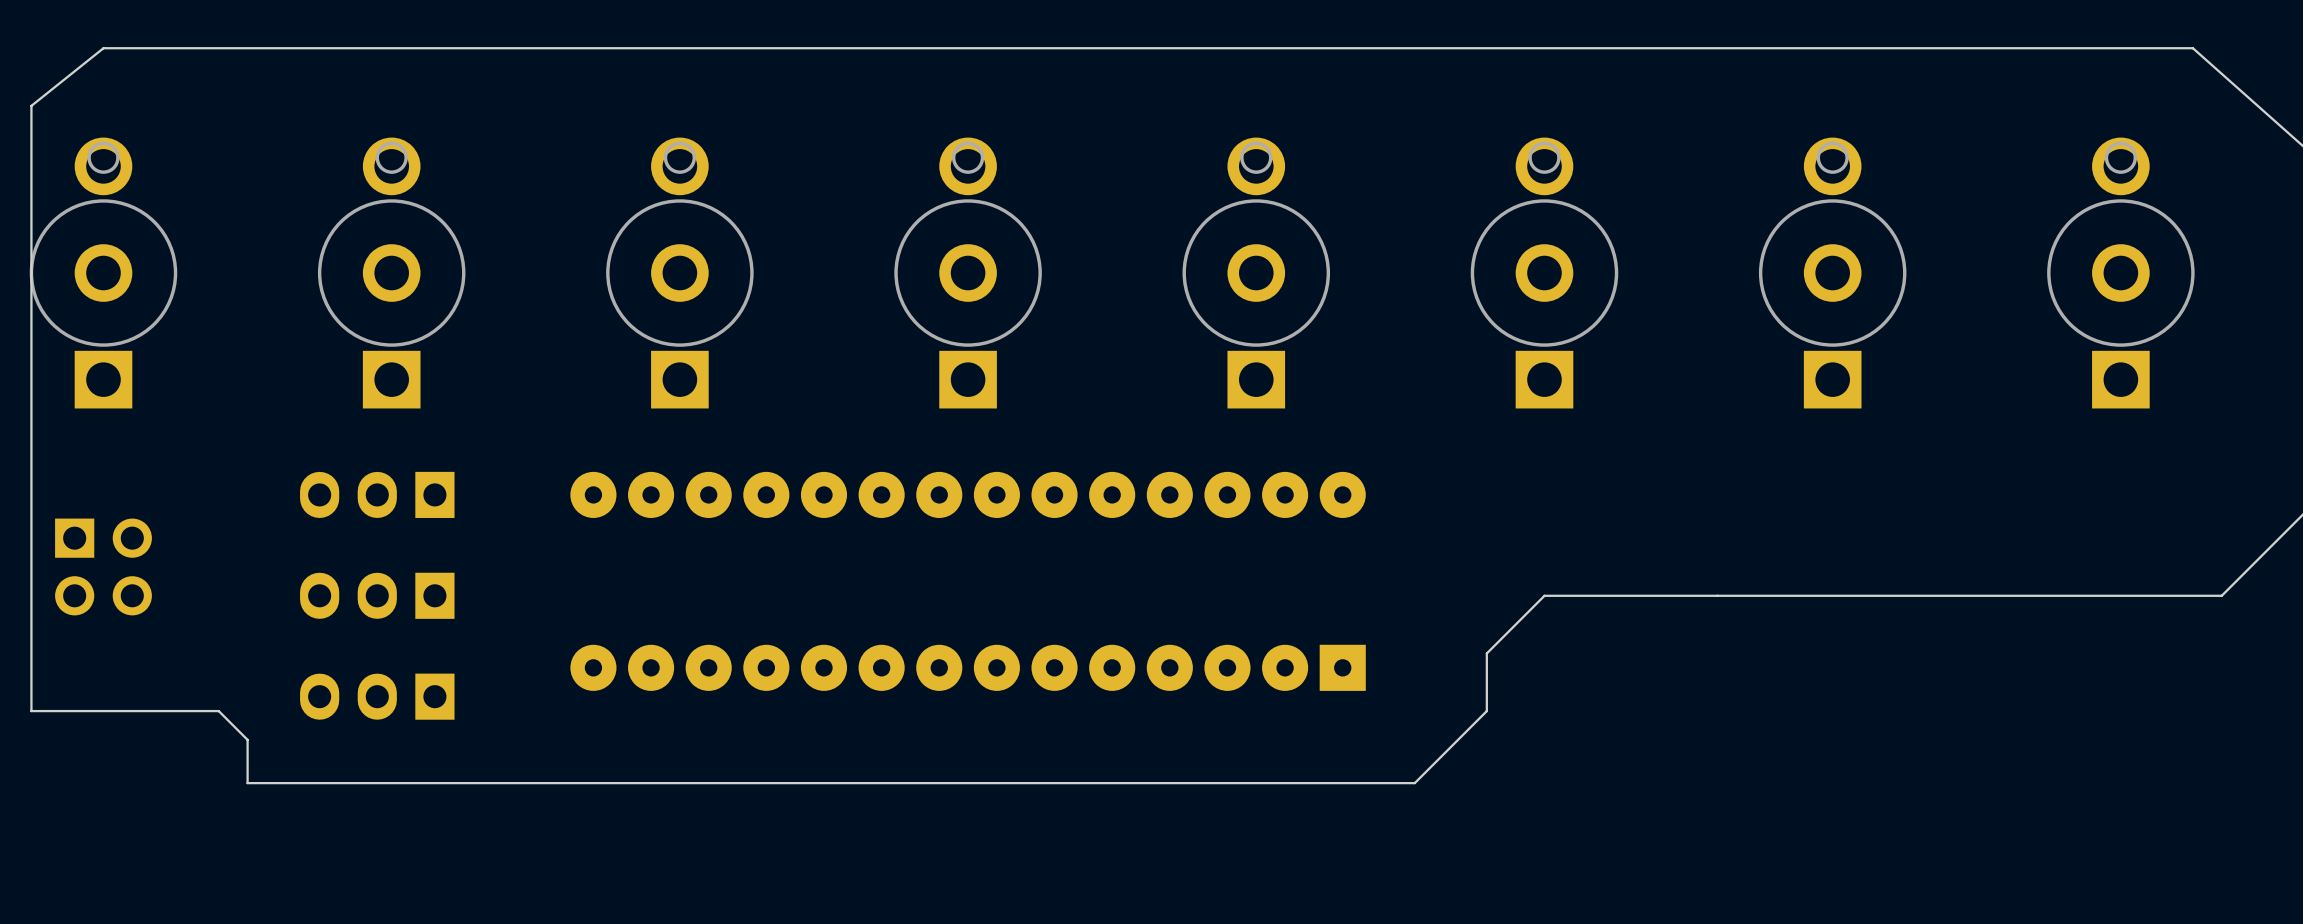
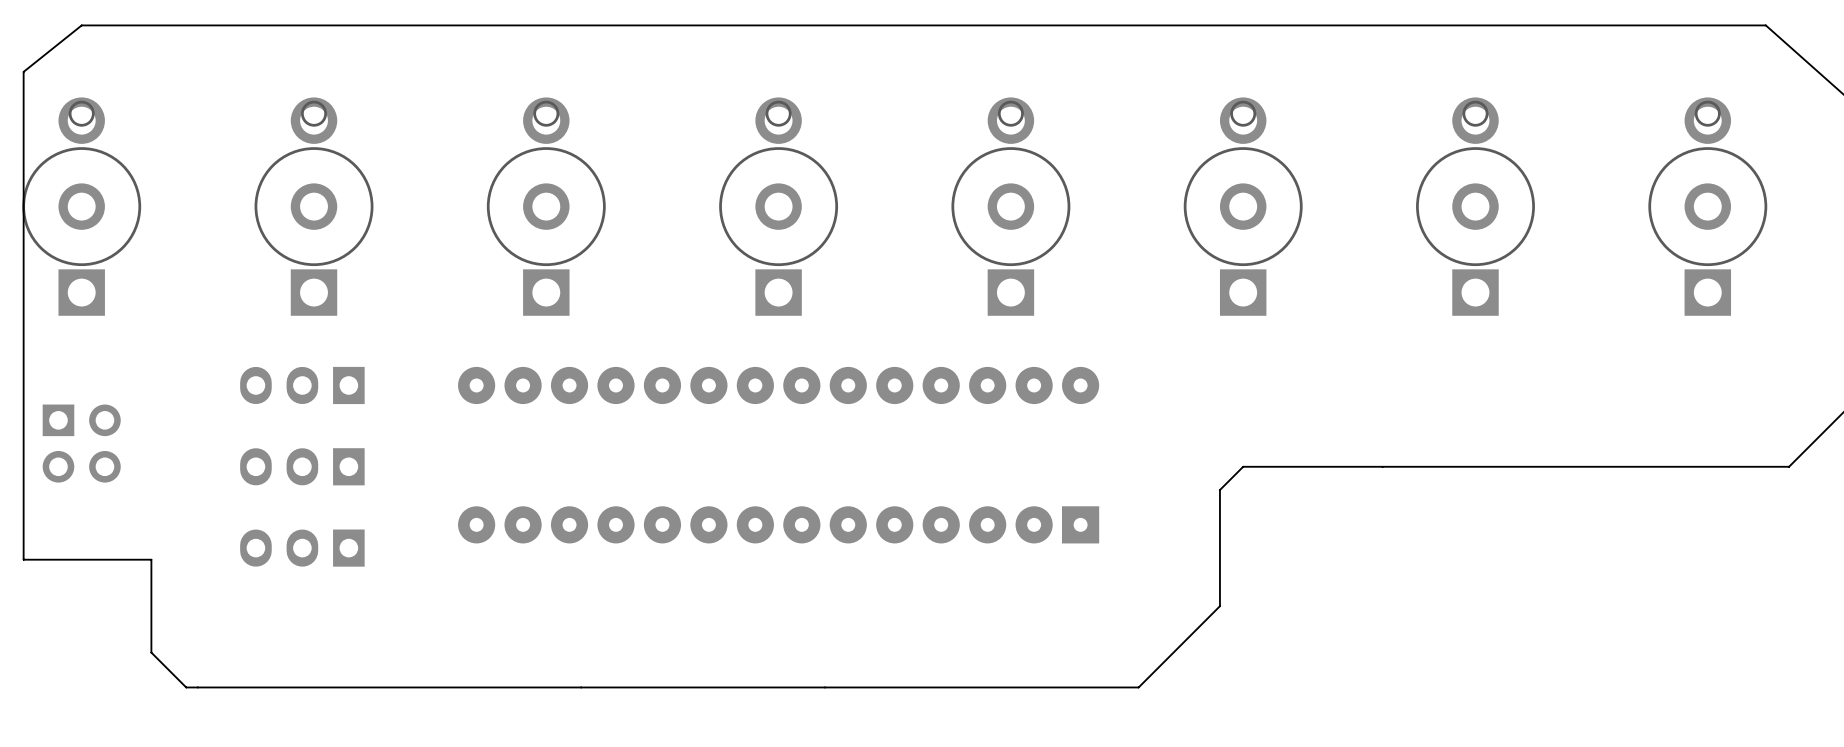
board edge: (1515, 624) (1486, 653) (1486, 711) (1414, 783) (247, 783) (247, 739) (218, 711) (189, 711) -> (1219, 490) (1219, 606) (1138, 687) (186, 687) (151, 652) (151, 559)

